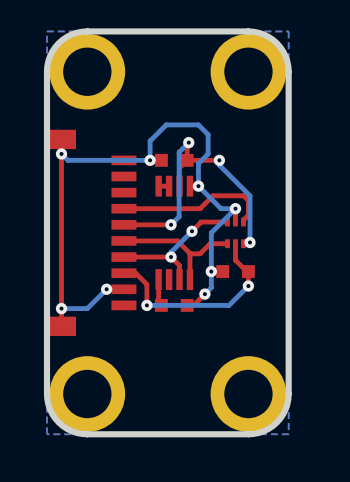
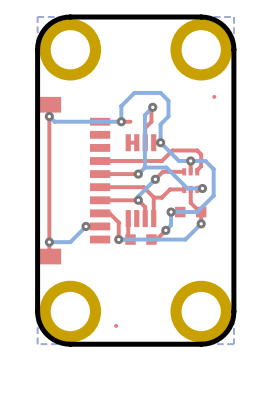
part: none -> (214, 96)
part: (174, 160) -> none
top track: (219, 160) (187, 160) -> none
bottom track: (219, 160) (219, 165) (249, 195) (249, 242) -> (144, 167) (166, 167) (187, 188) (202, 188)
via: (219, 160) -> none
bottom track: (235, 208) (211, 232) (211, 271) -> (190, 160) (205, 160) (213, 169) (213, 195) (197, 212) (171, 212)
part: none -> (116, 325)

